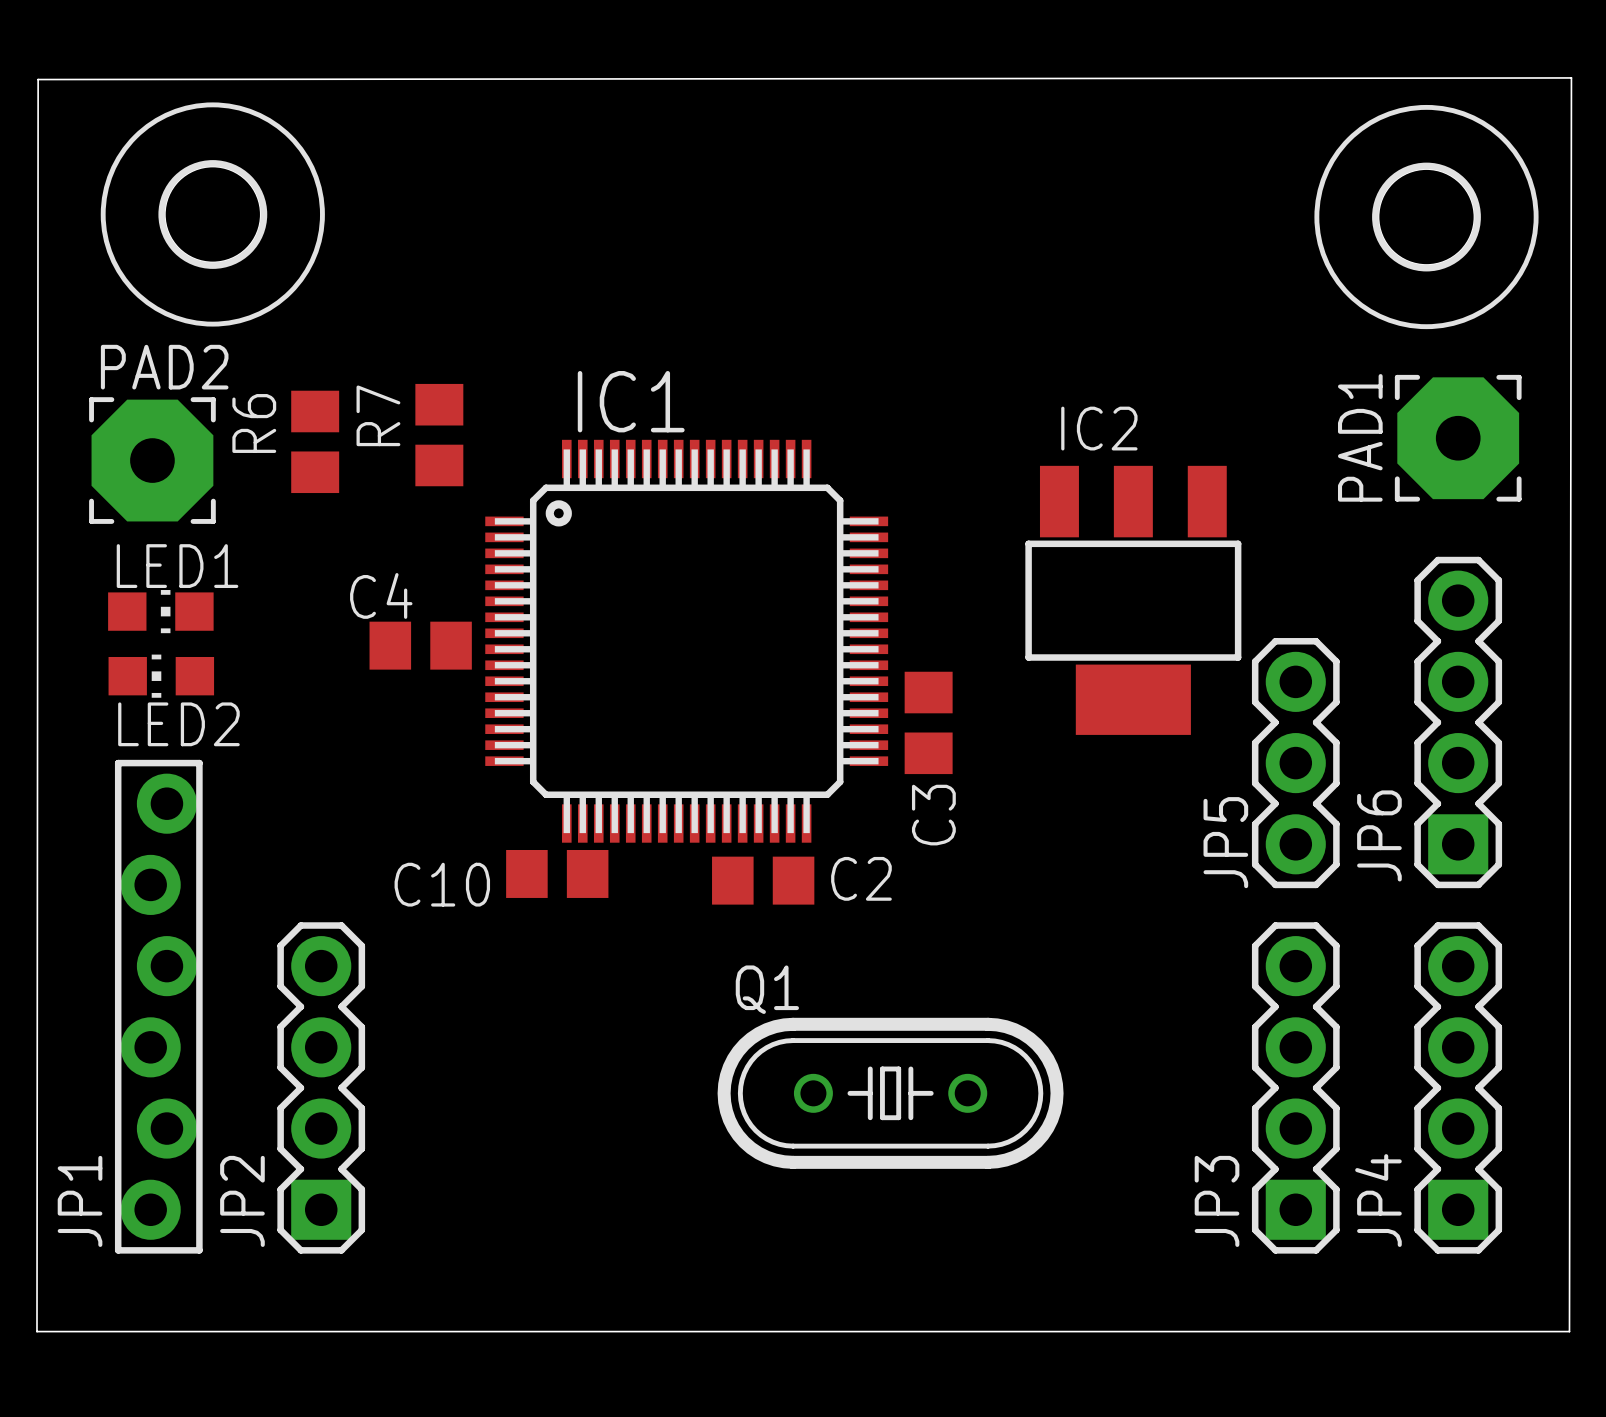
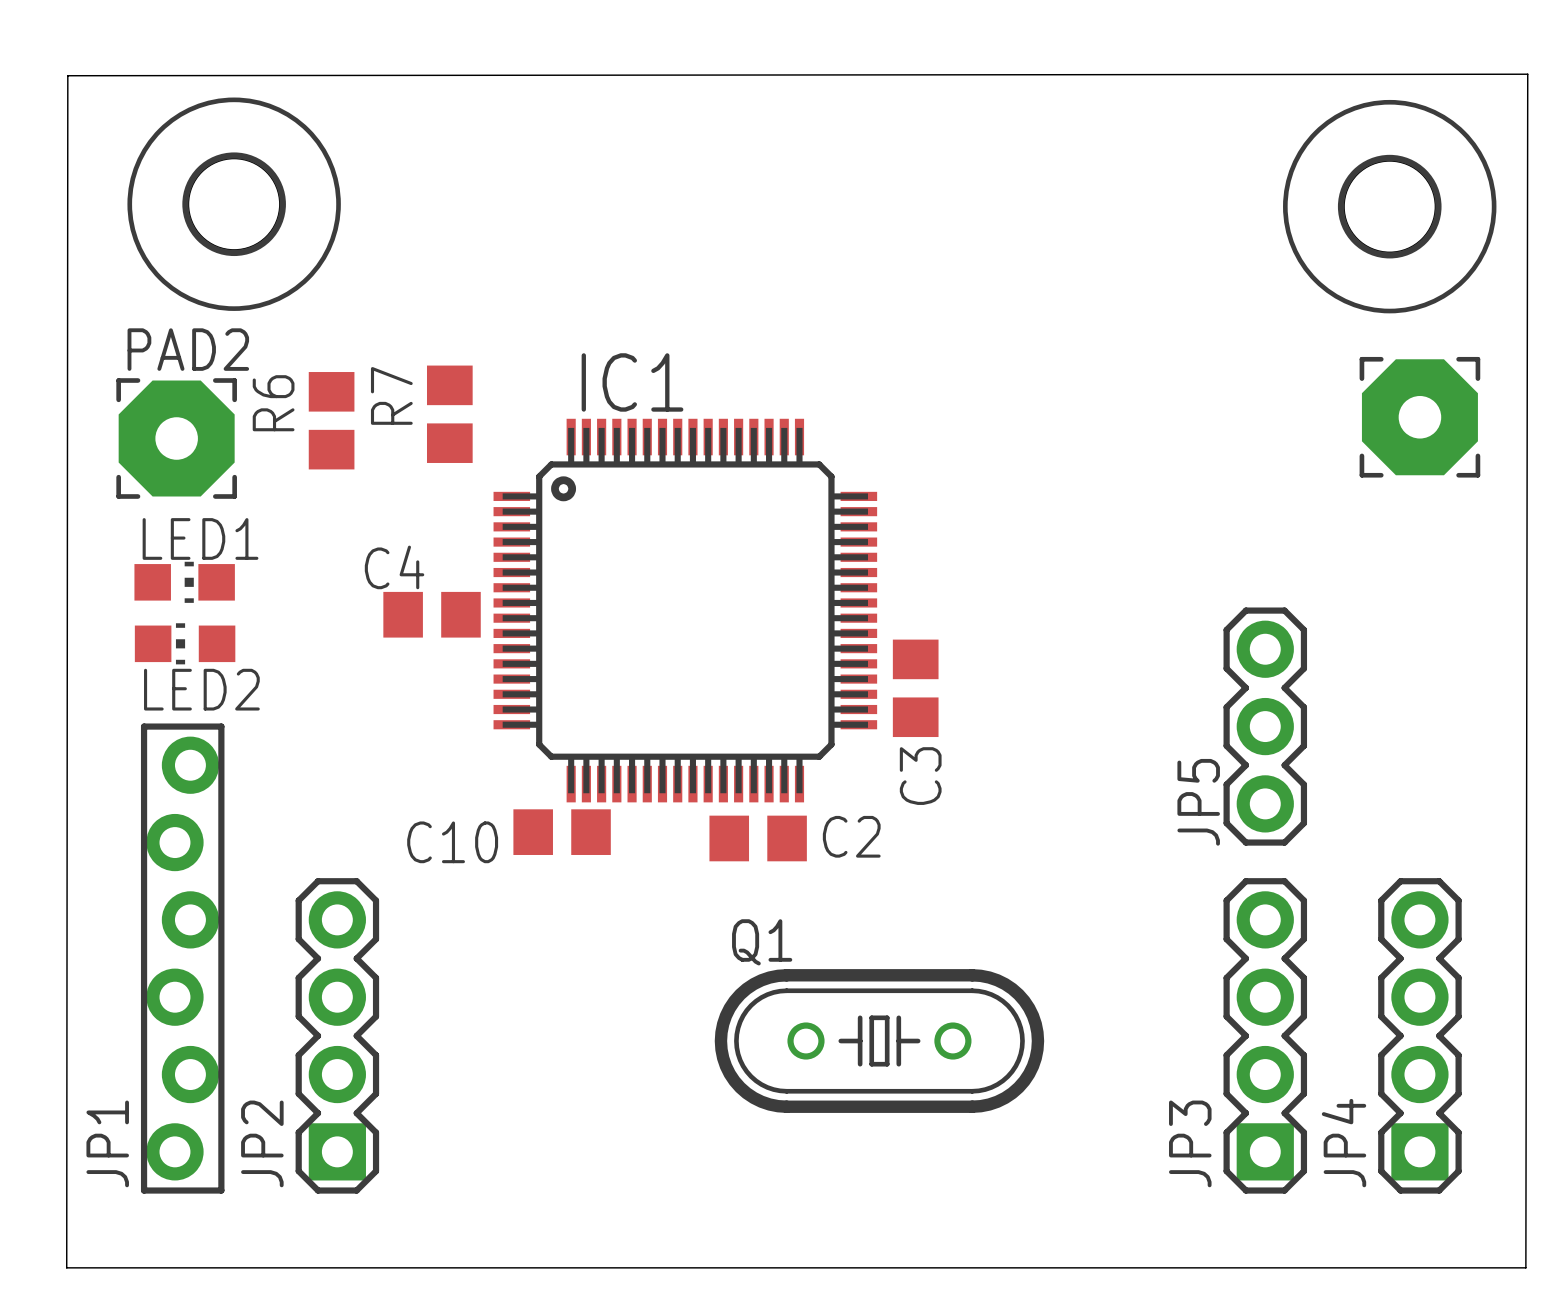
PAD1 name: PAD1 (1360, 437) -> none
IC2: (1133, 600) -> none
JP6: (1458, 722) -> none

